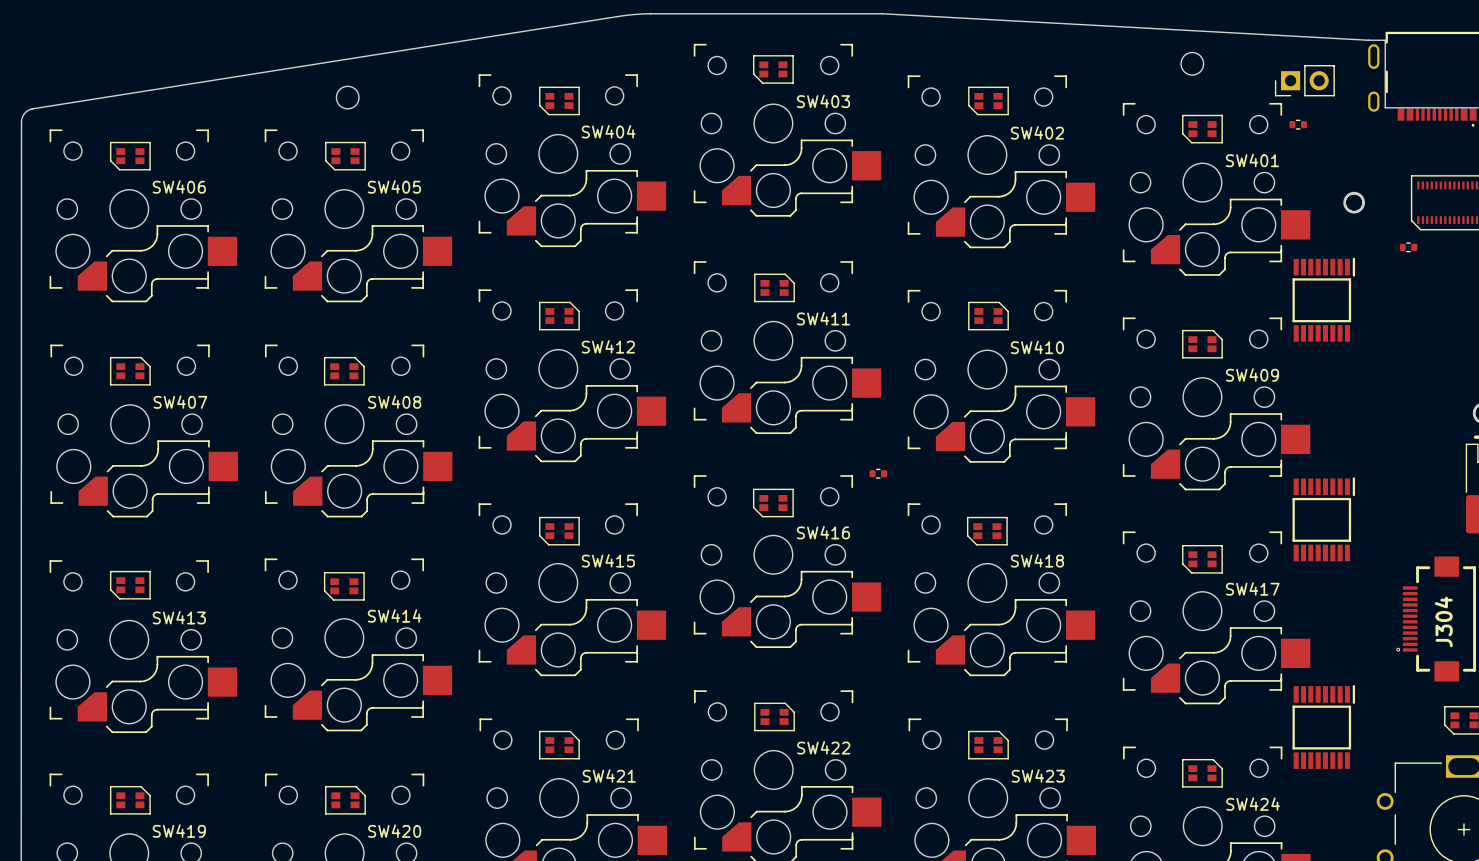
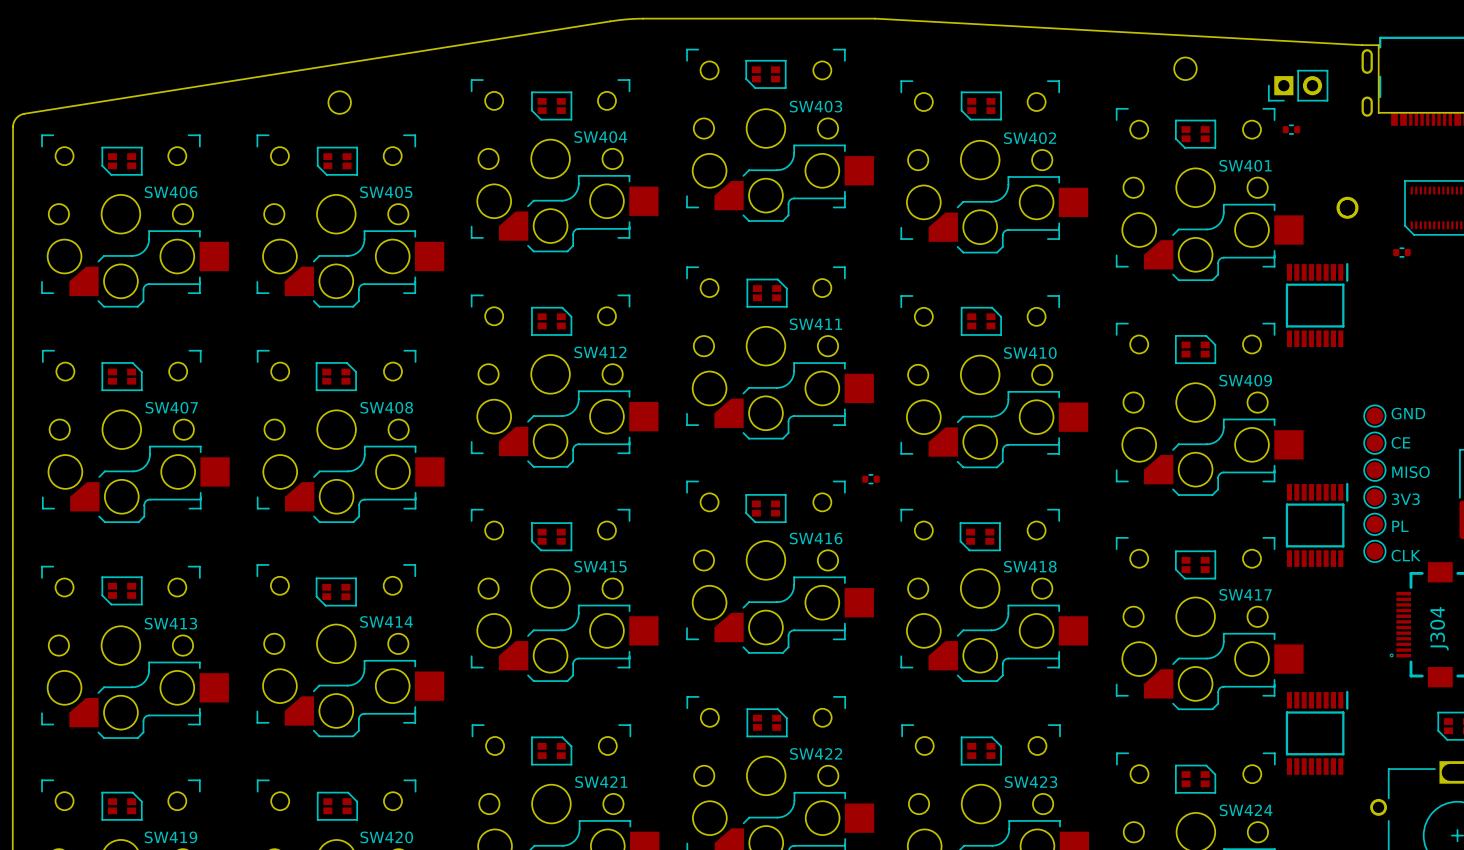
text: none -> GND (1408, 413)
part: none -> (1374, 416)
part: none -> (1374, 443)
text: none -> CE (1400, 442)
part: none -> (1374, 470)
text: none -> MISO (1410, 472)
part: none -> (1374, 497)
text: none -> 3V3 (1405, 499)
part: none -> (1374, 524)
text: none -> PL (1400, 526)
part: none -> (1374, 551)
text: none -> CLK (1406, 555)

